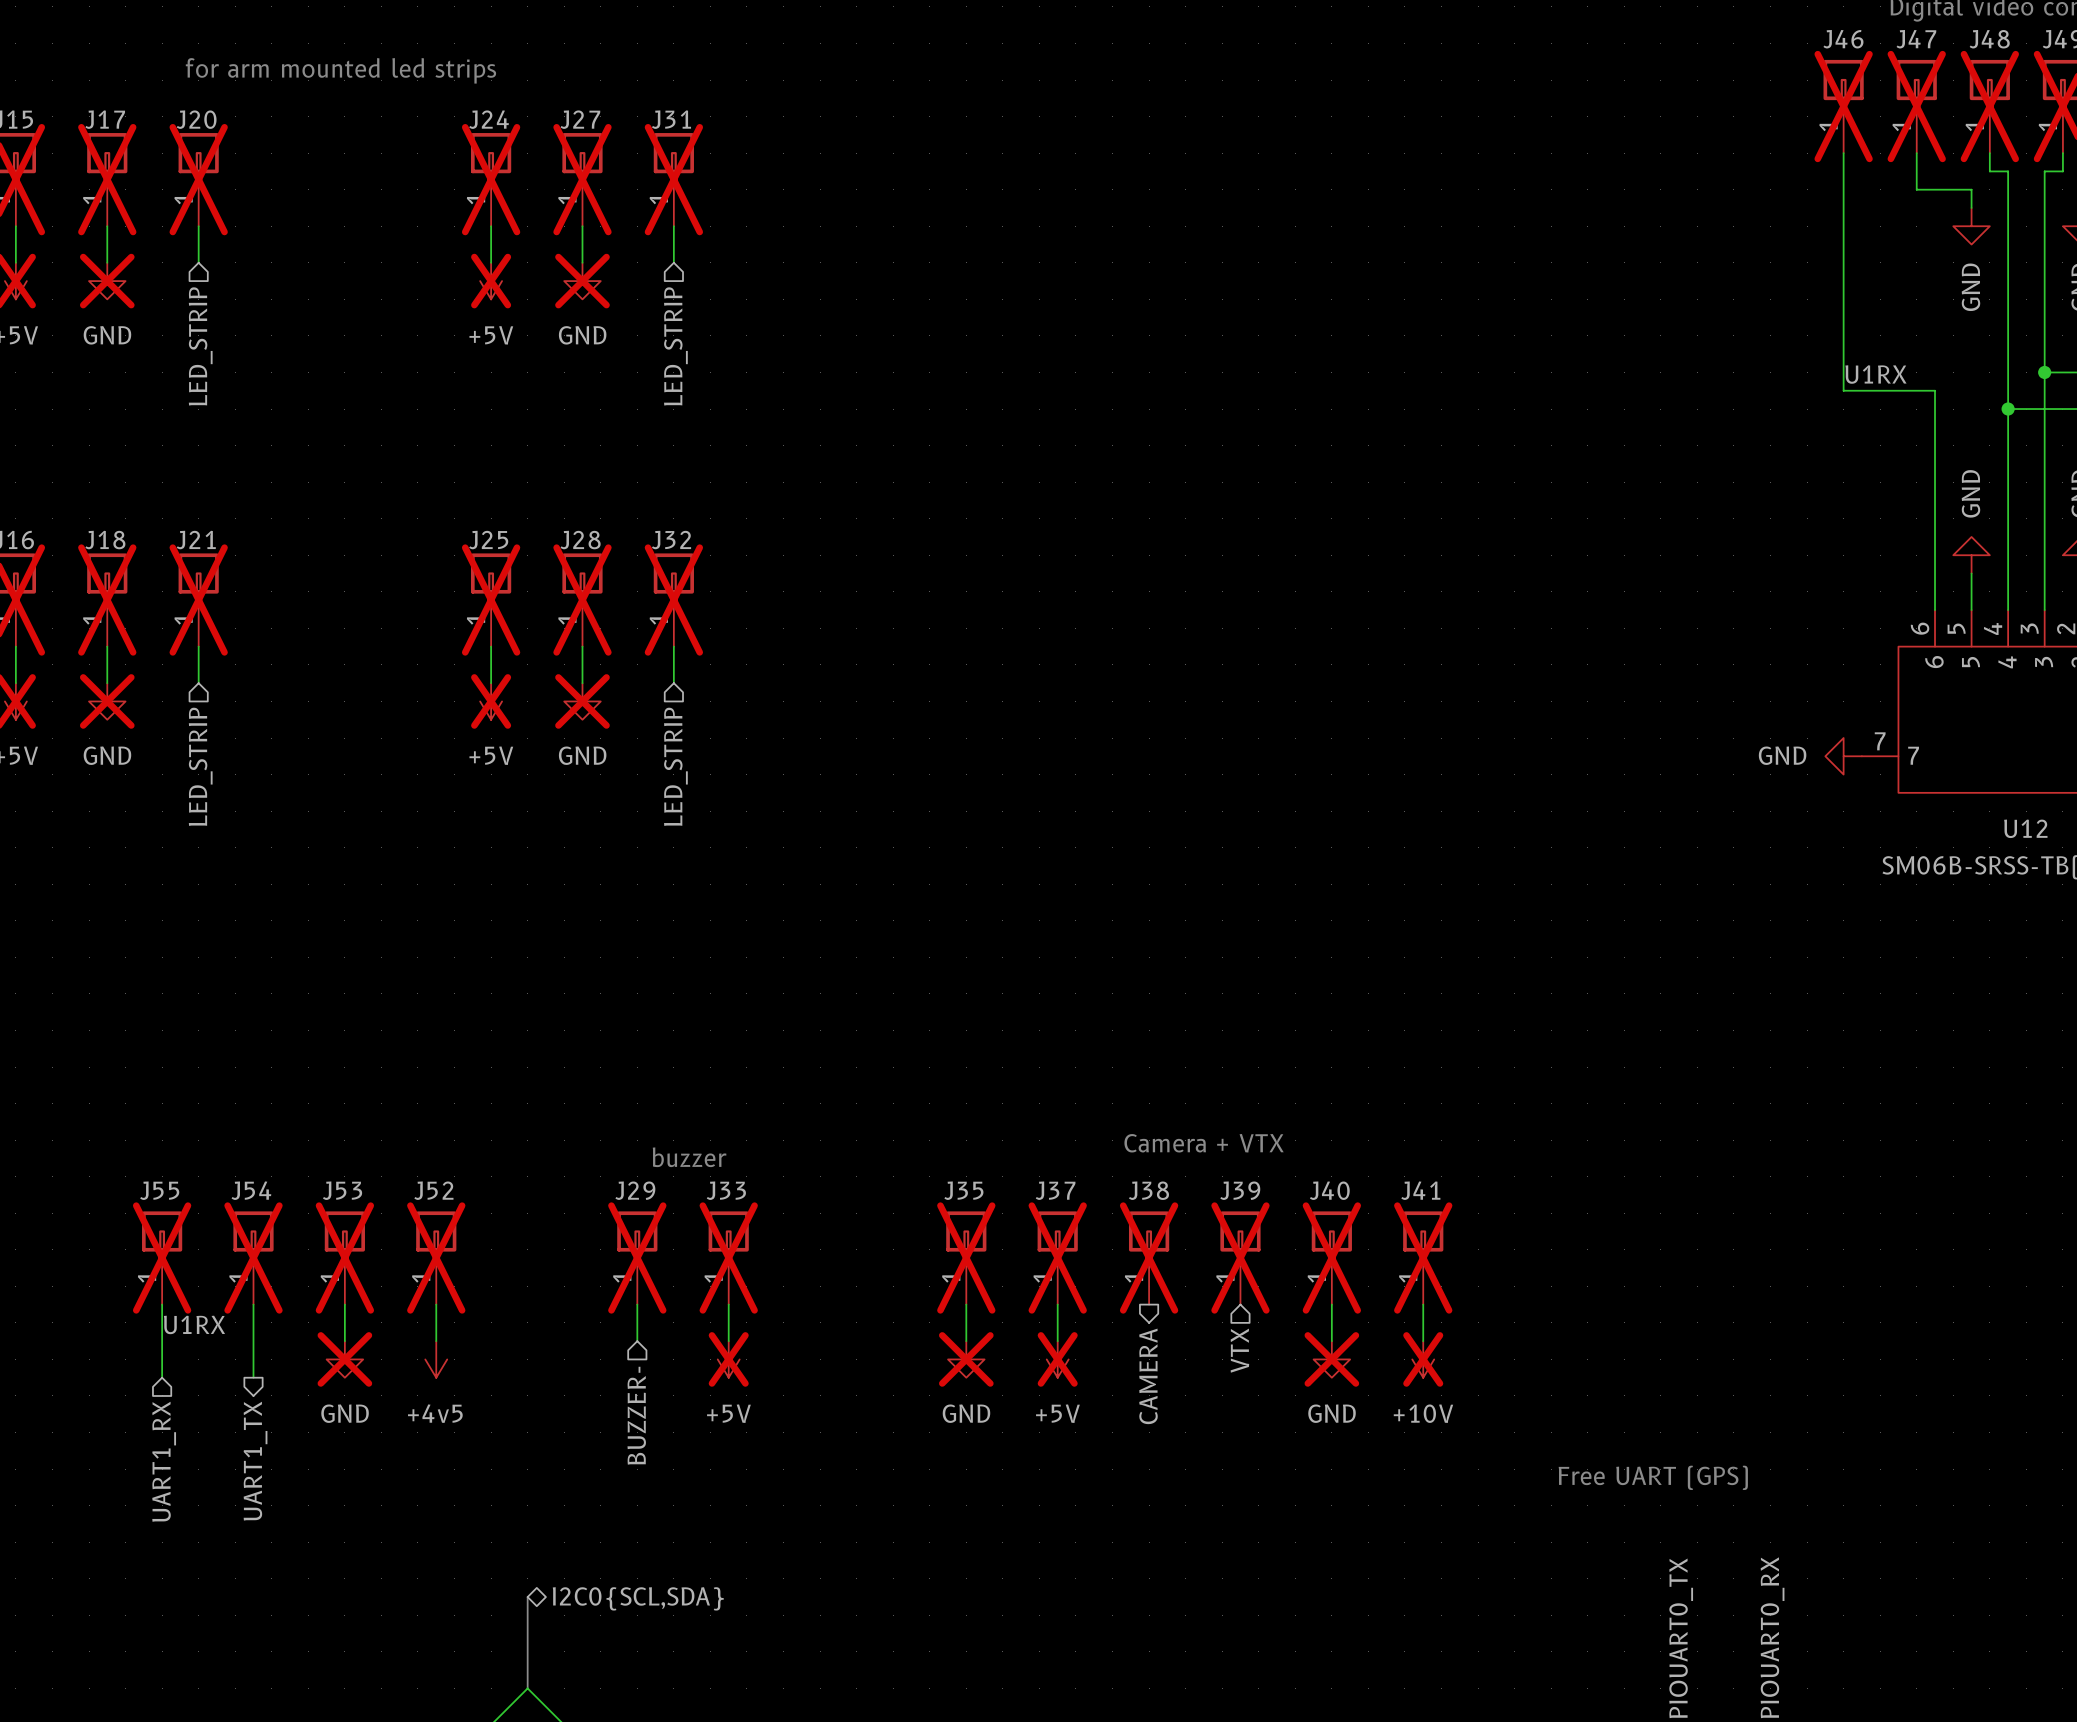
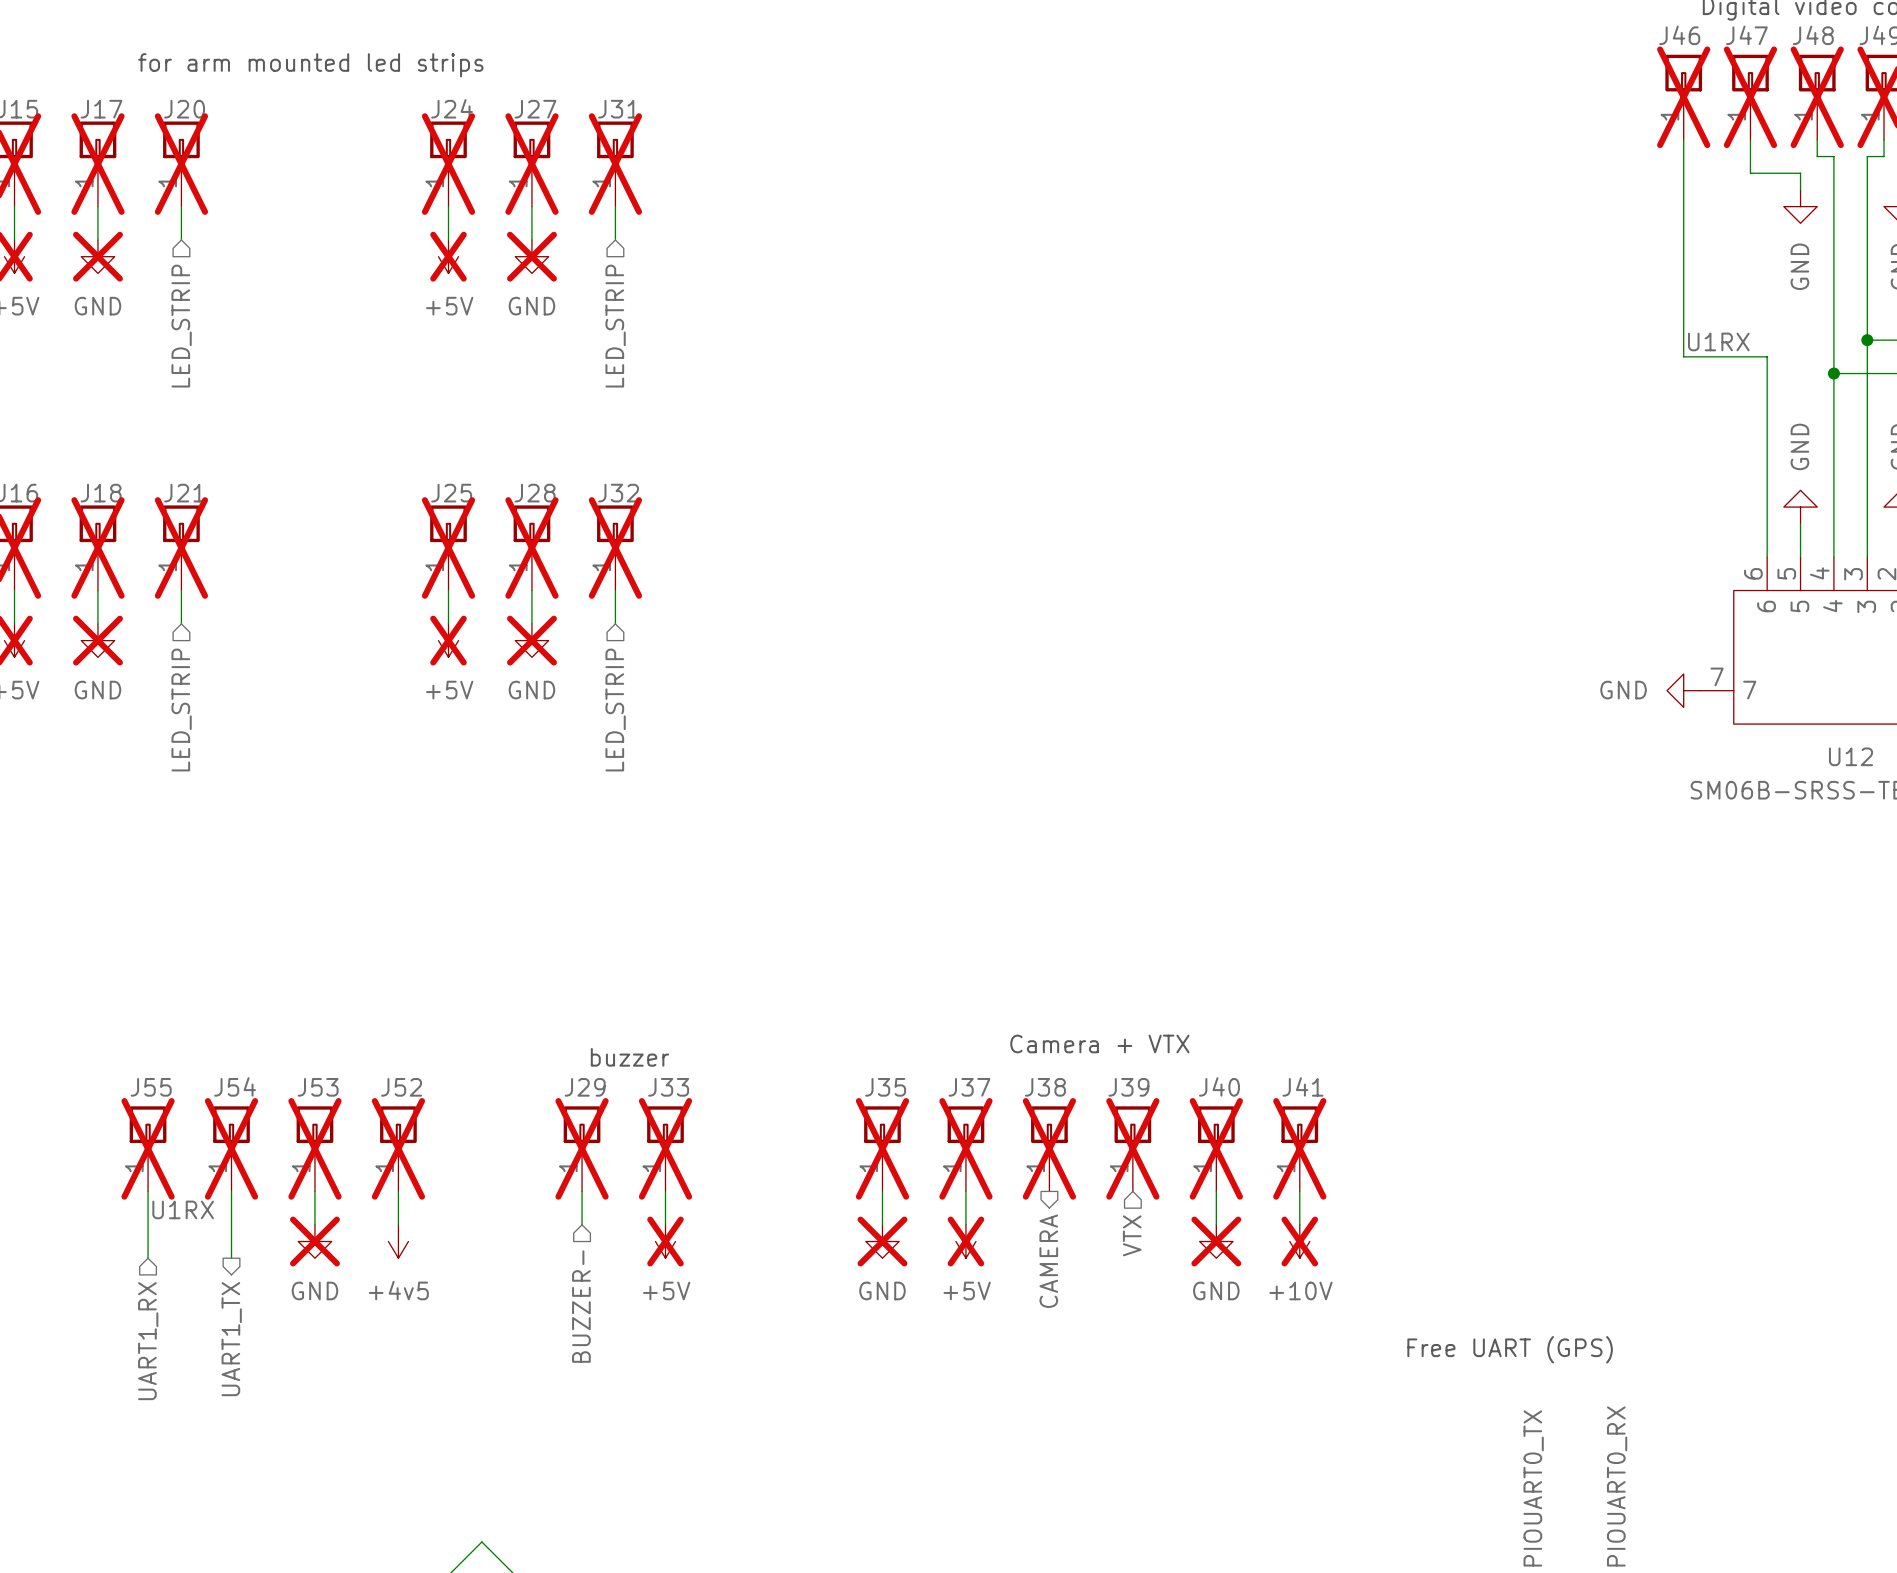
bus: (527, 1597) (527, 1688) -> none
hierarchical label: I2C0{SCL,SDA} (638, 1598) -> none

